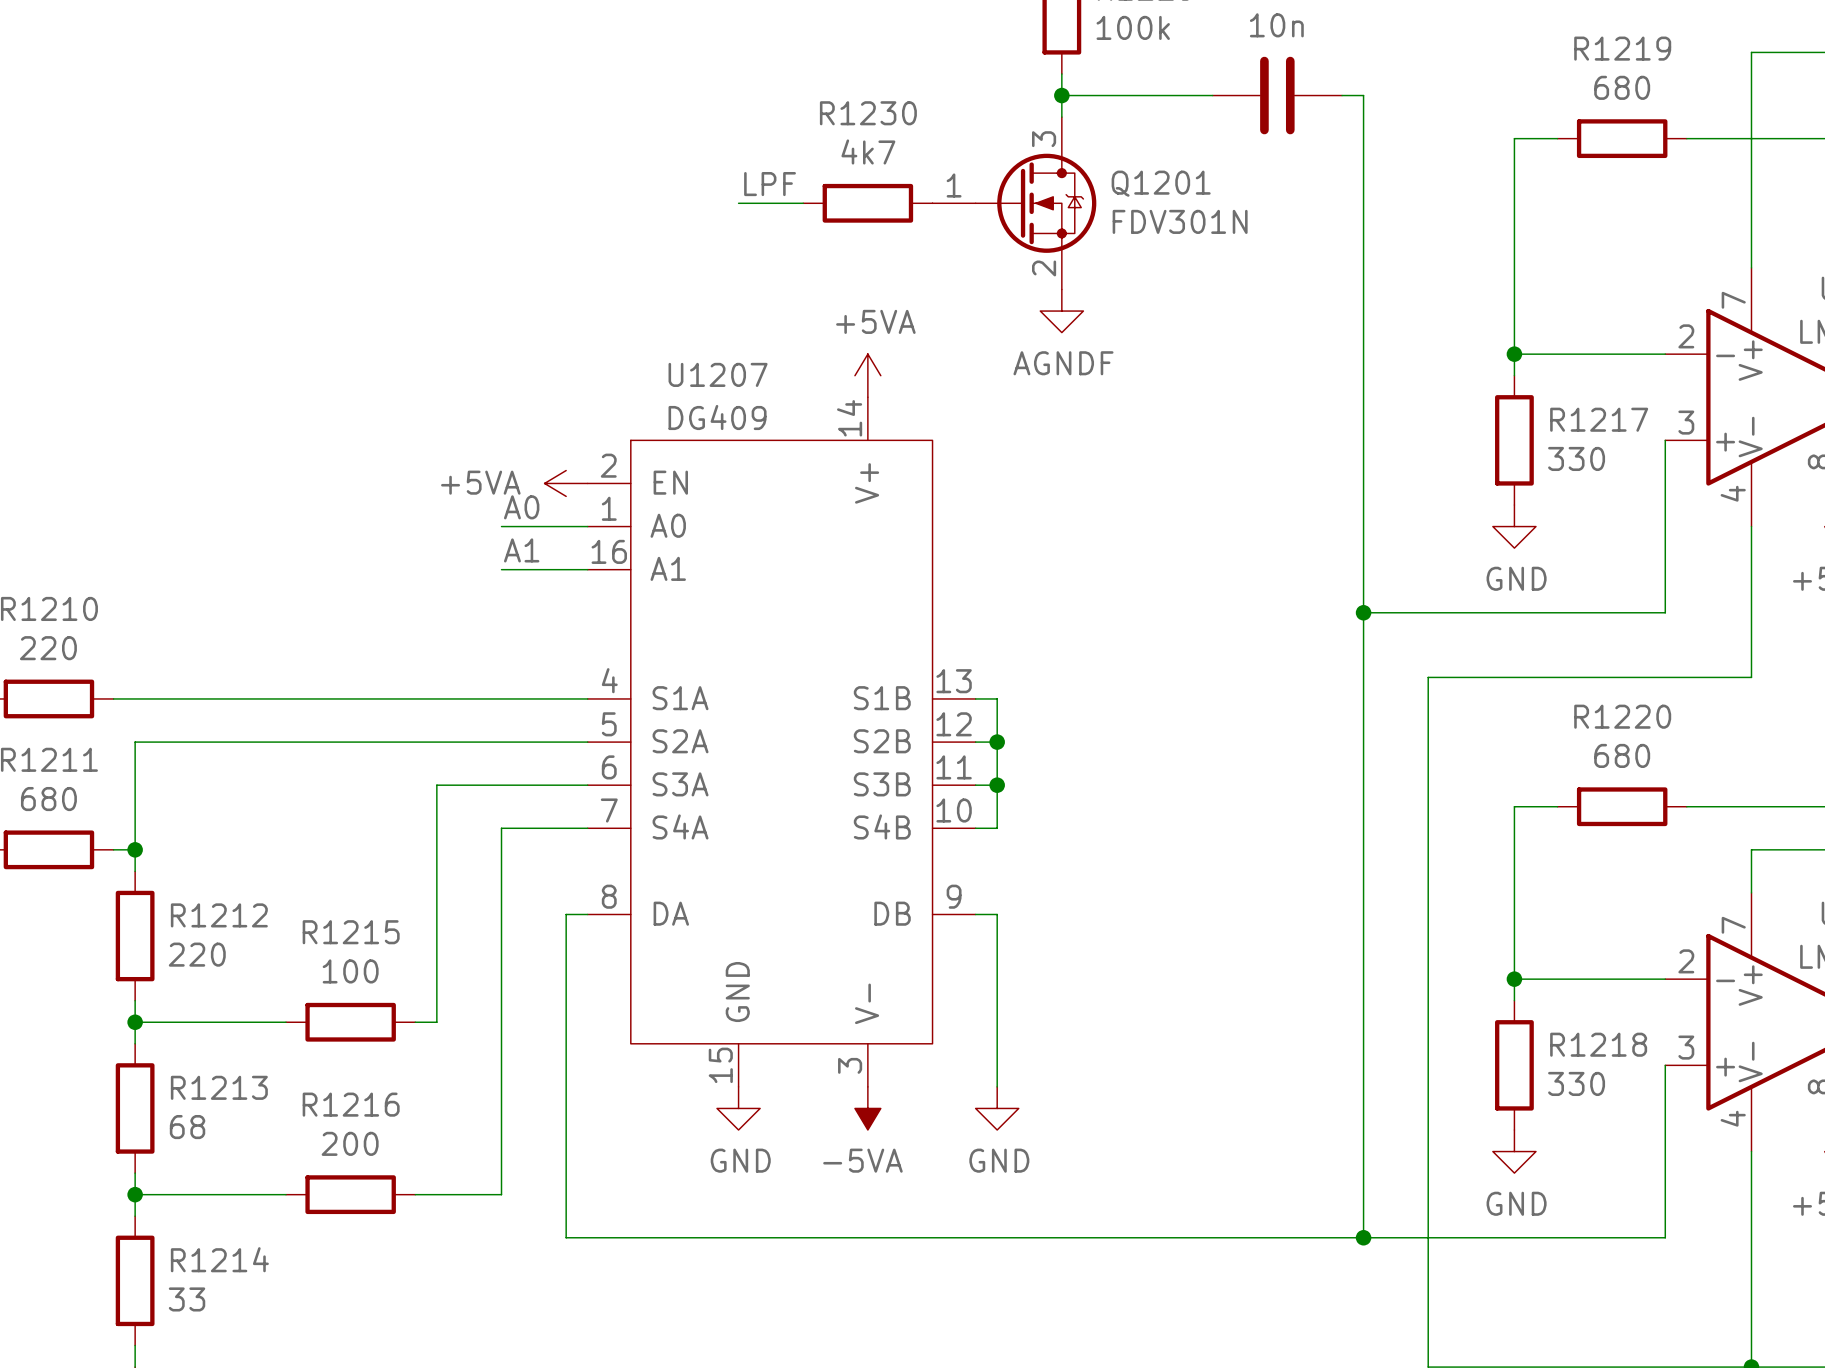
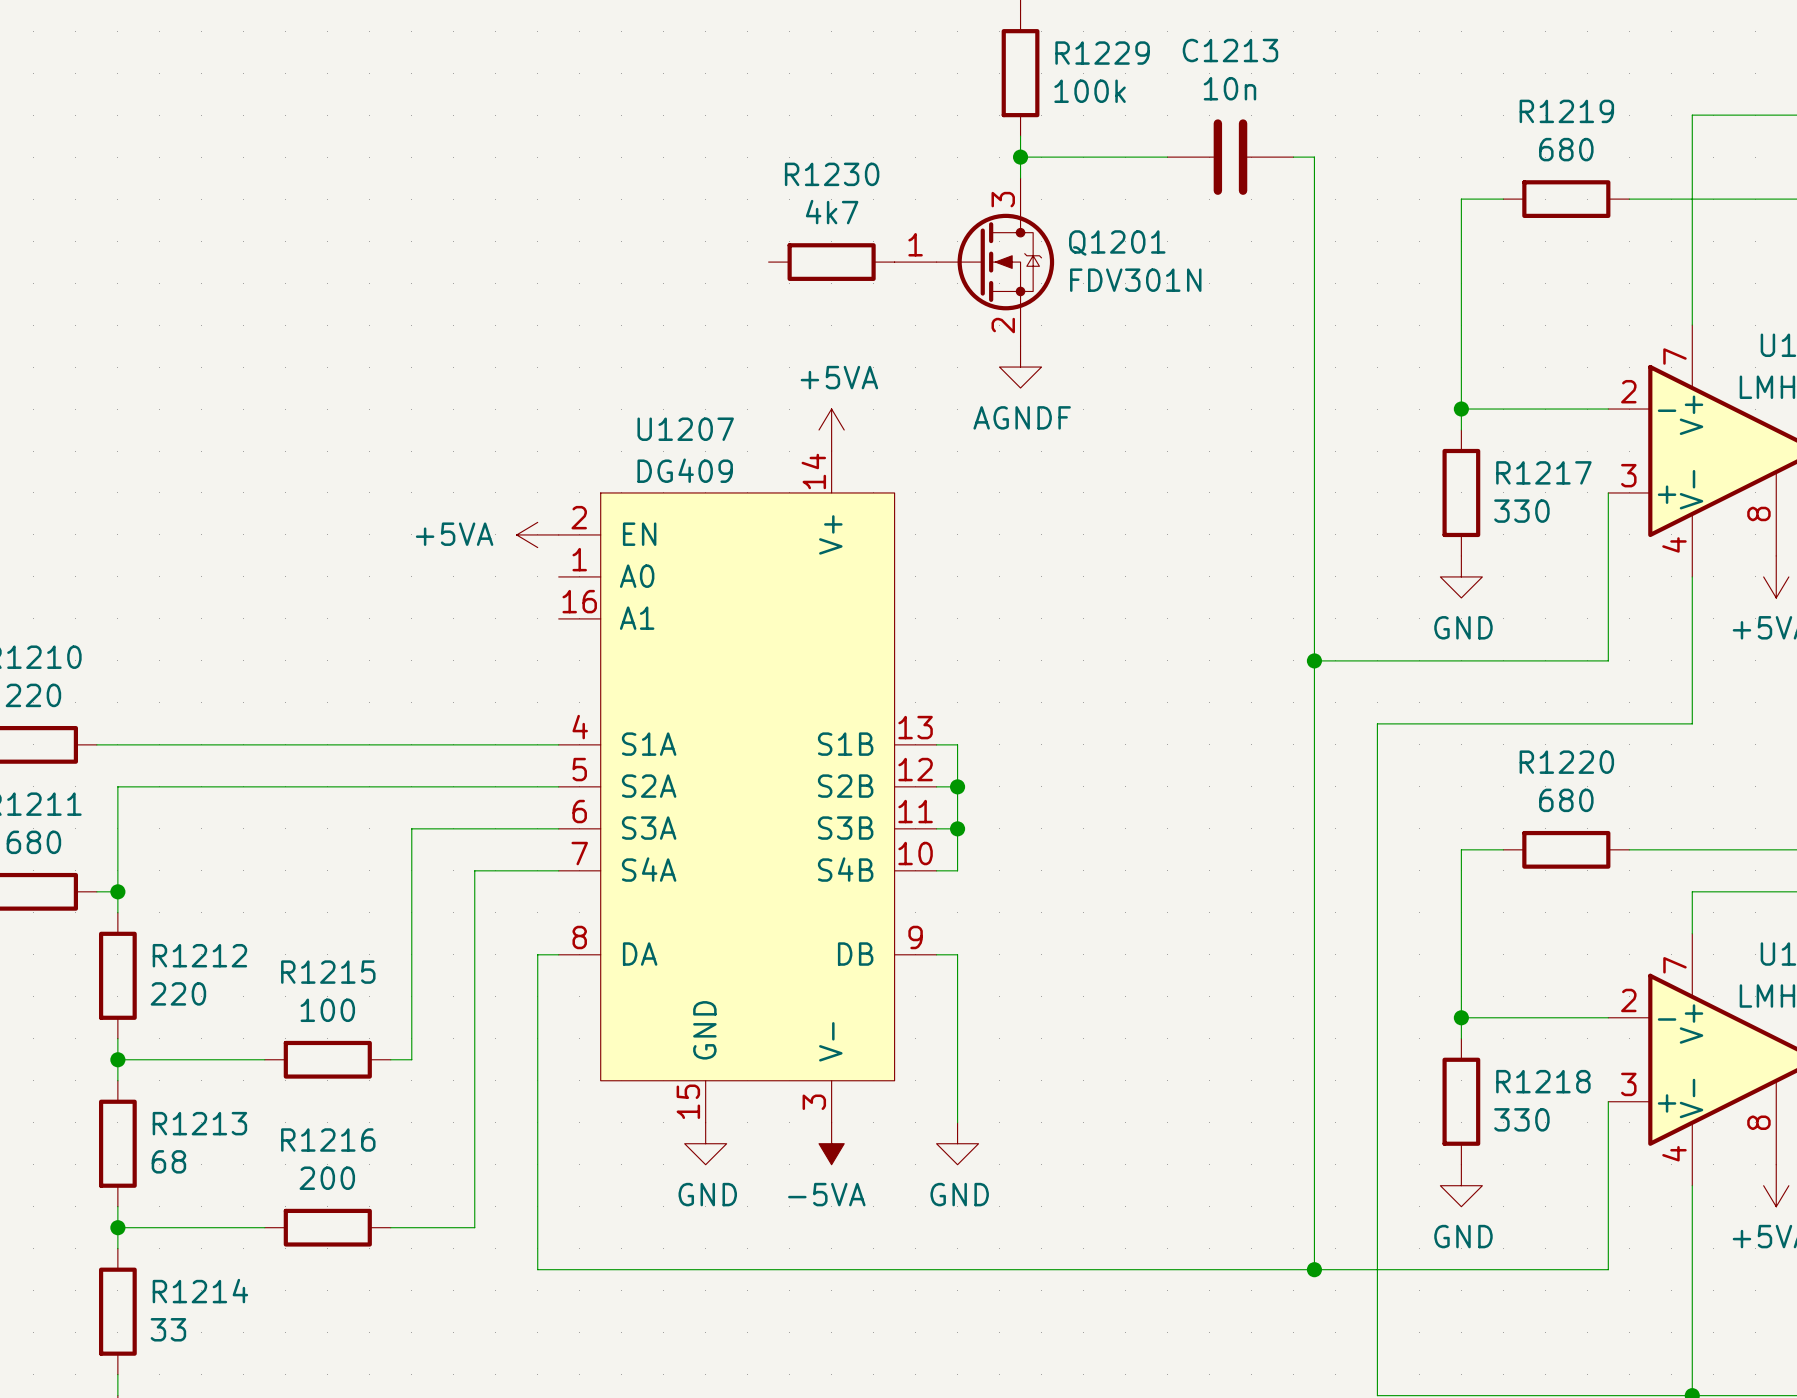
label: LPF (770, 184) -> none
wire: (738, 203) (803, 203) -> none
label: A0 (521, 507) -> none
wire: (501, 526) (587, 526) -> none
label: A1 (521, 550) -> none
wire: (501, 569) (587, 569) -> none

